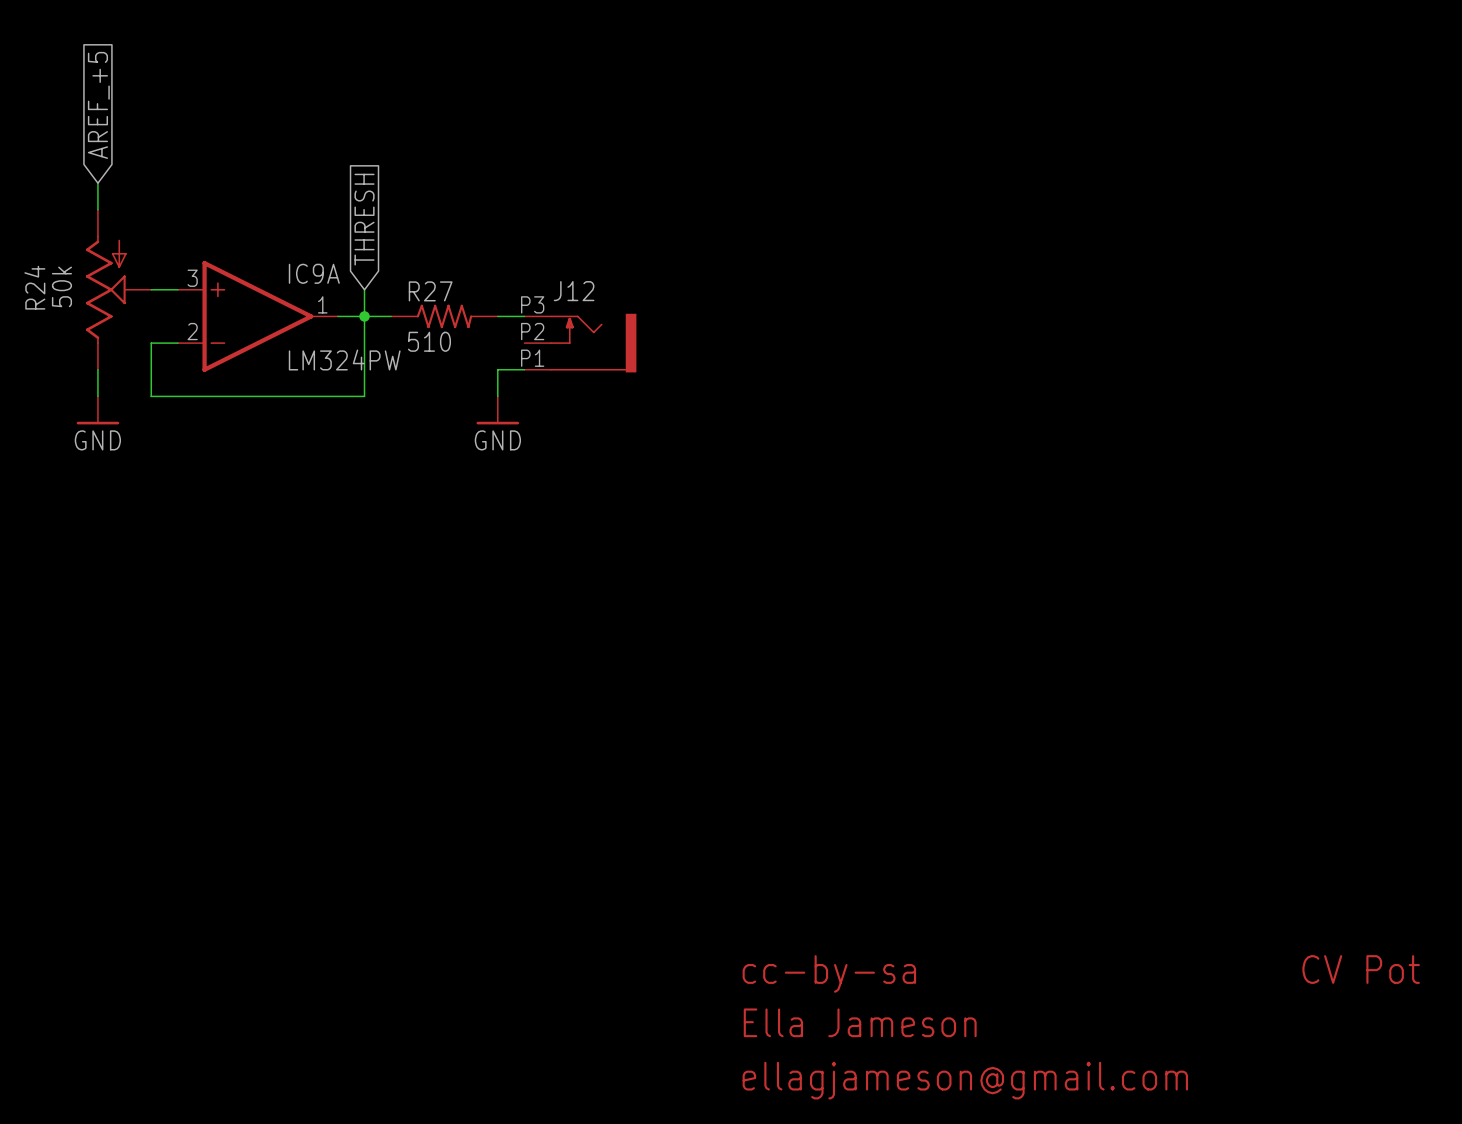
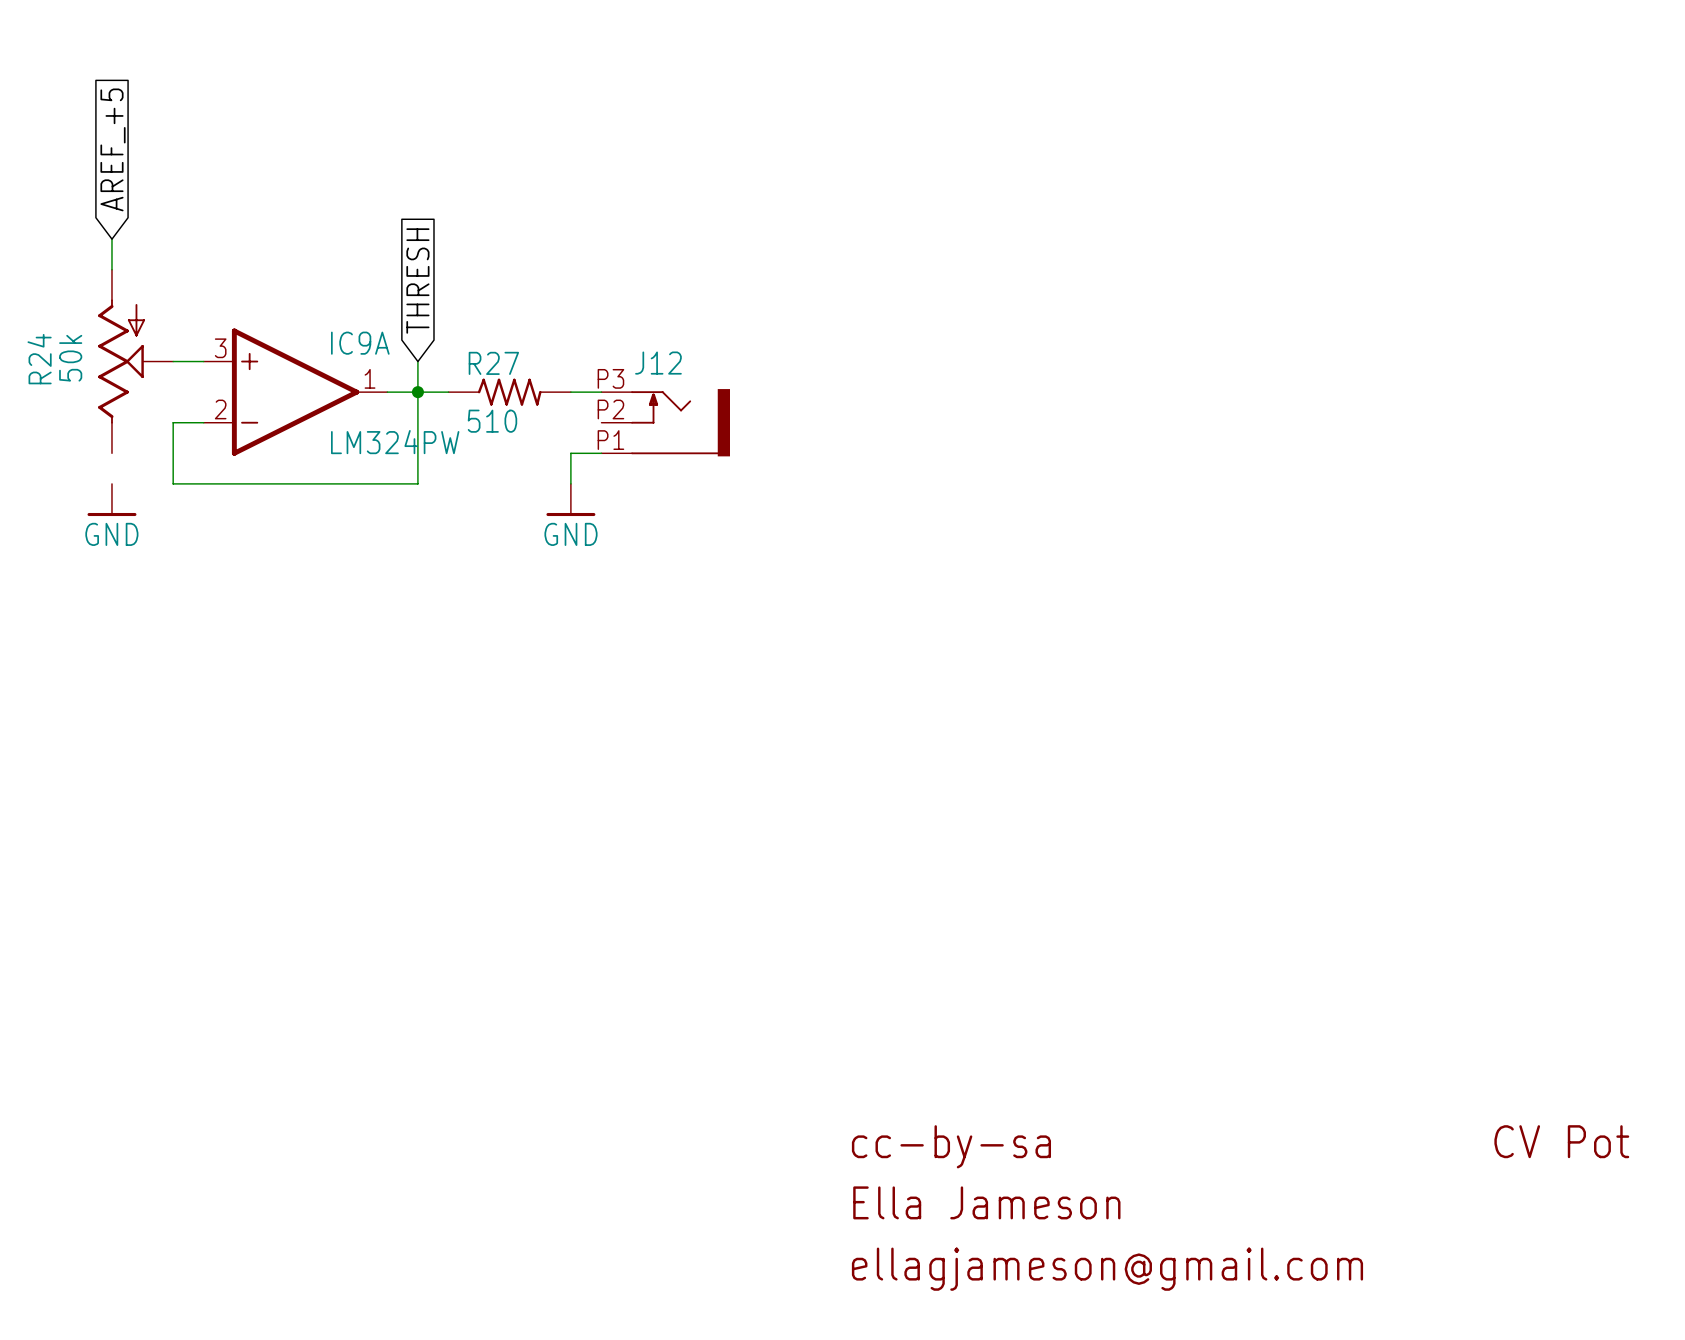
wire: (97, 369) (97, 396) -> none

